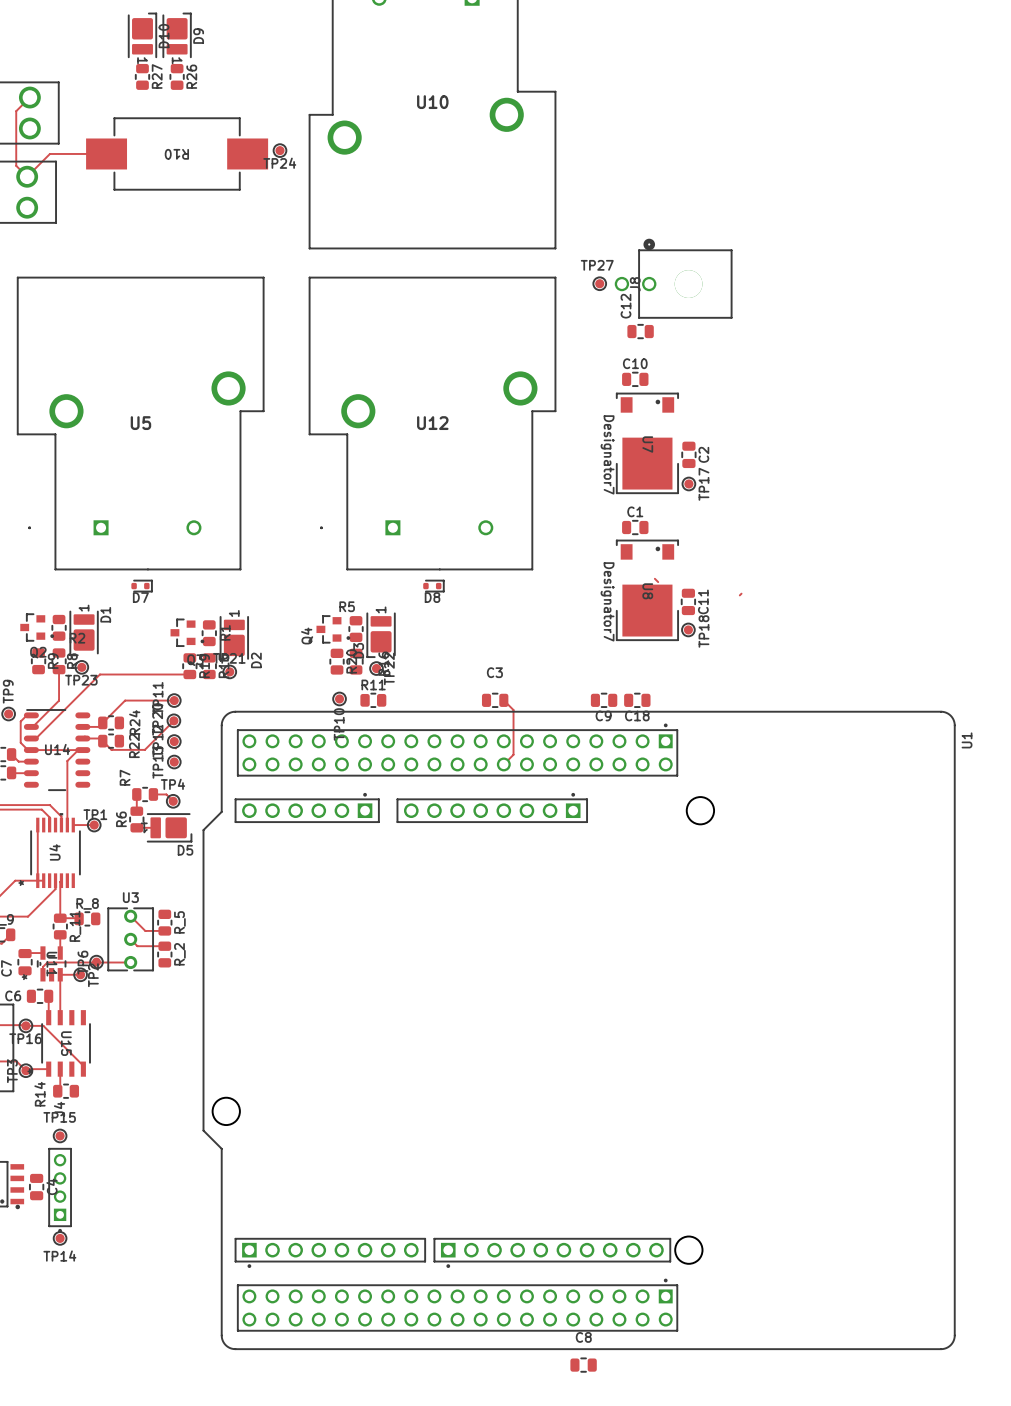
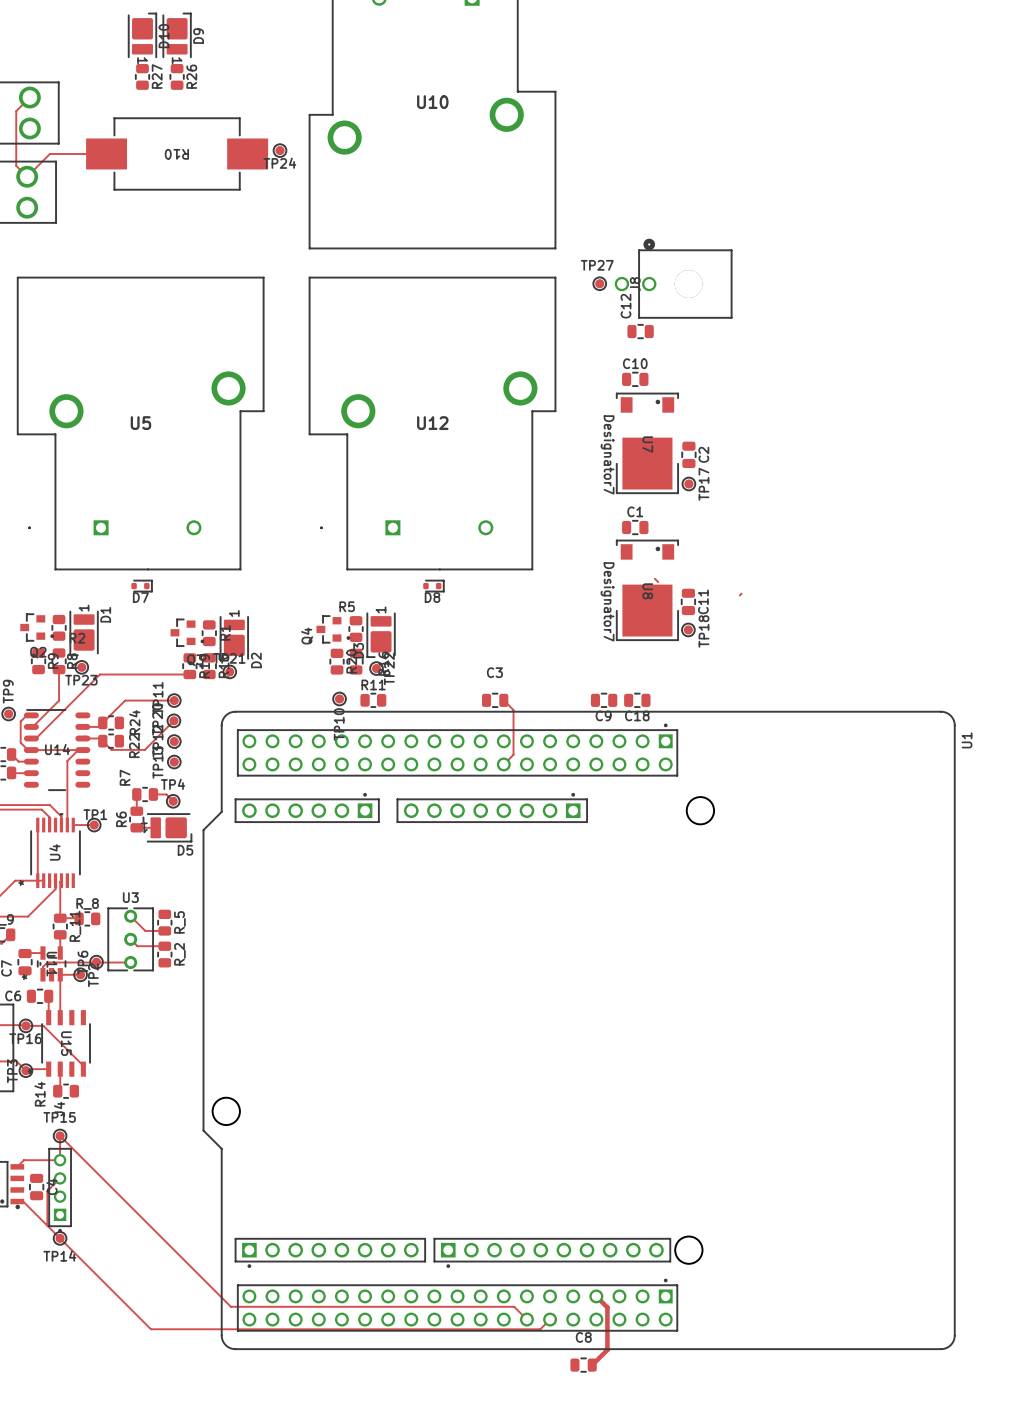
track: none -> (17, 1166) (23, 1160) (60, 1160) (60, 1135) (230, 1306) (514, 1306) (526, 1319)
track: none -> (60, 1178) (47, 1191) (47, 1225)
track: none -> (17, 1201) (23, 1201) (150, 1329) (540, 1329) (550, 1319)
track: none -> (596, 1296) (607, 1307) (607, 1349) (592, 1365)

